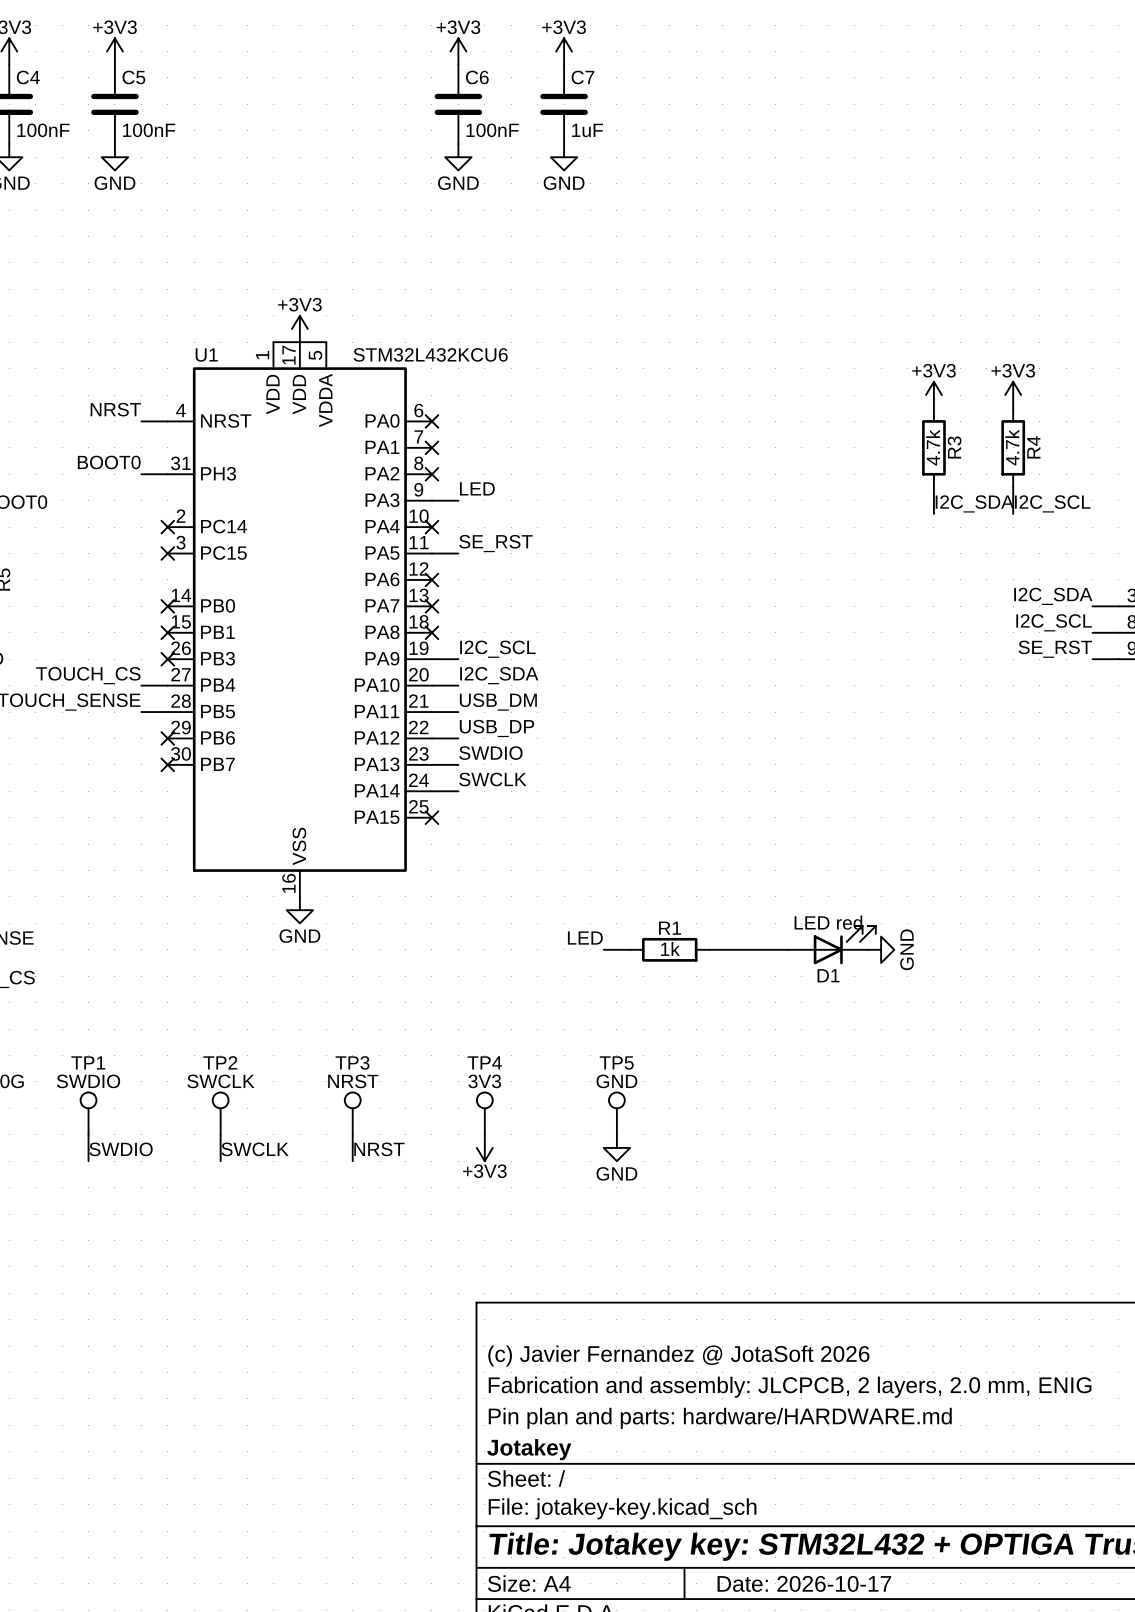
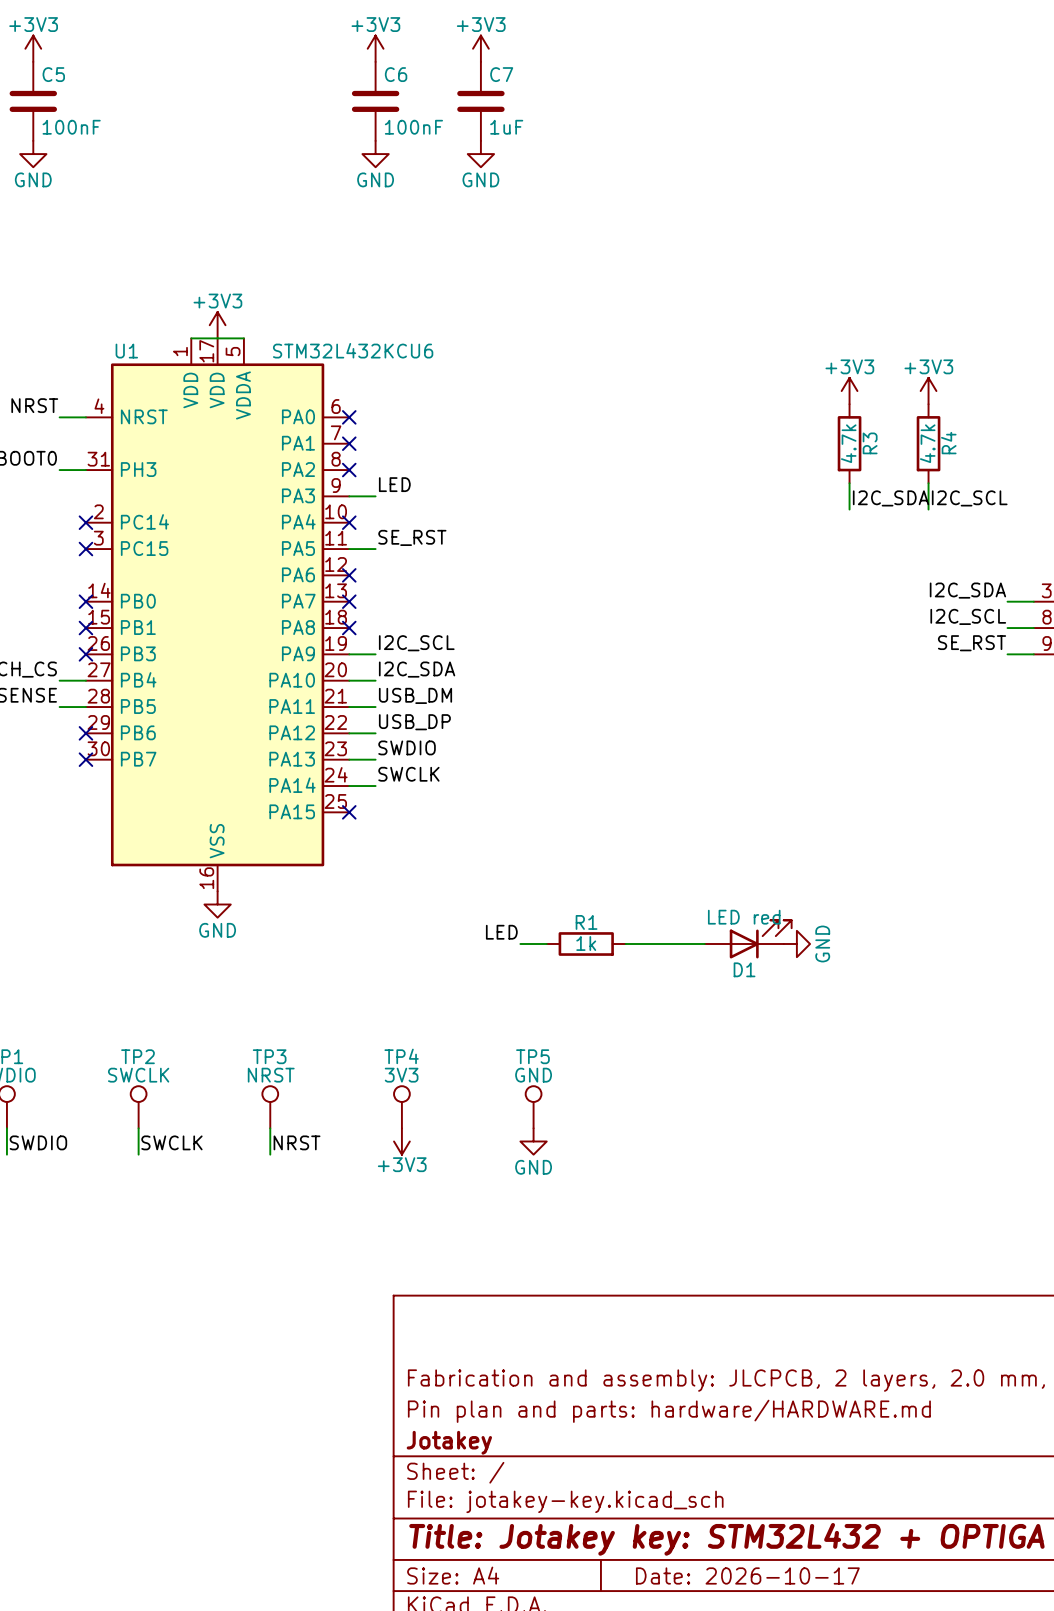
title block: (c) Javier Fernandez @ JotaSoft 2026 (678, 1355) -> none

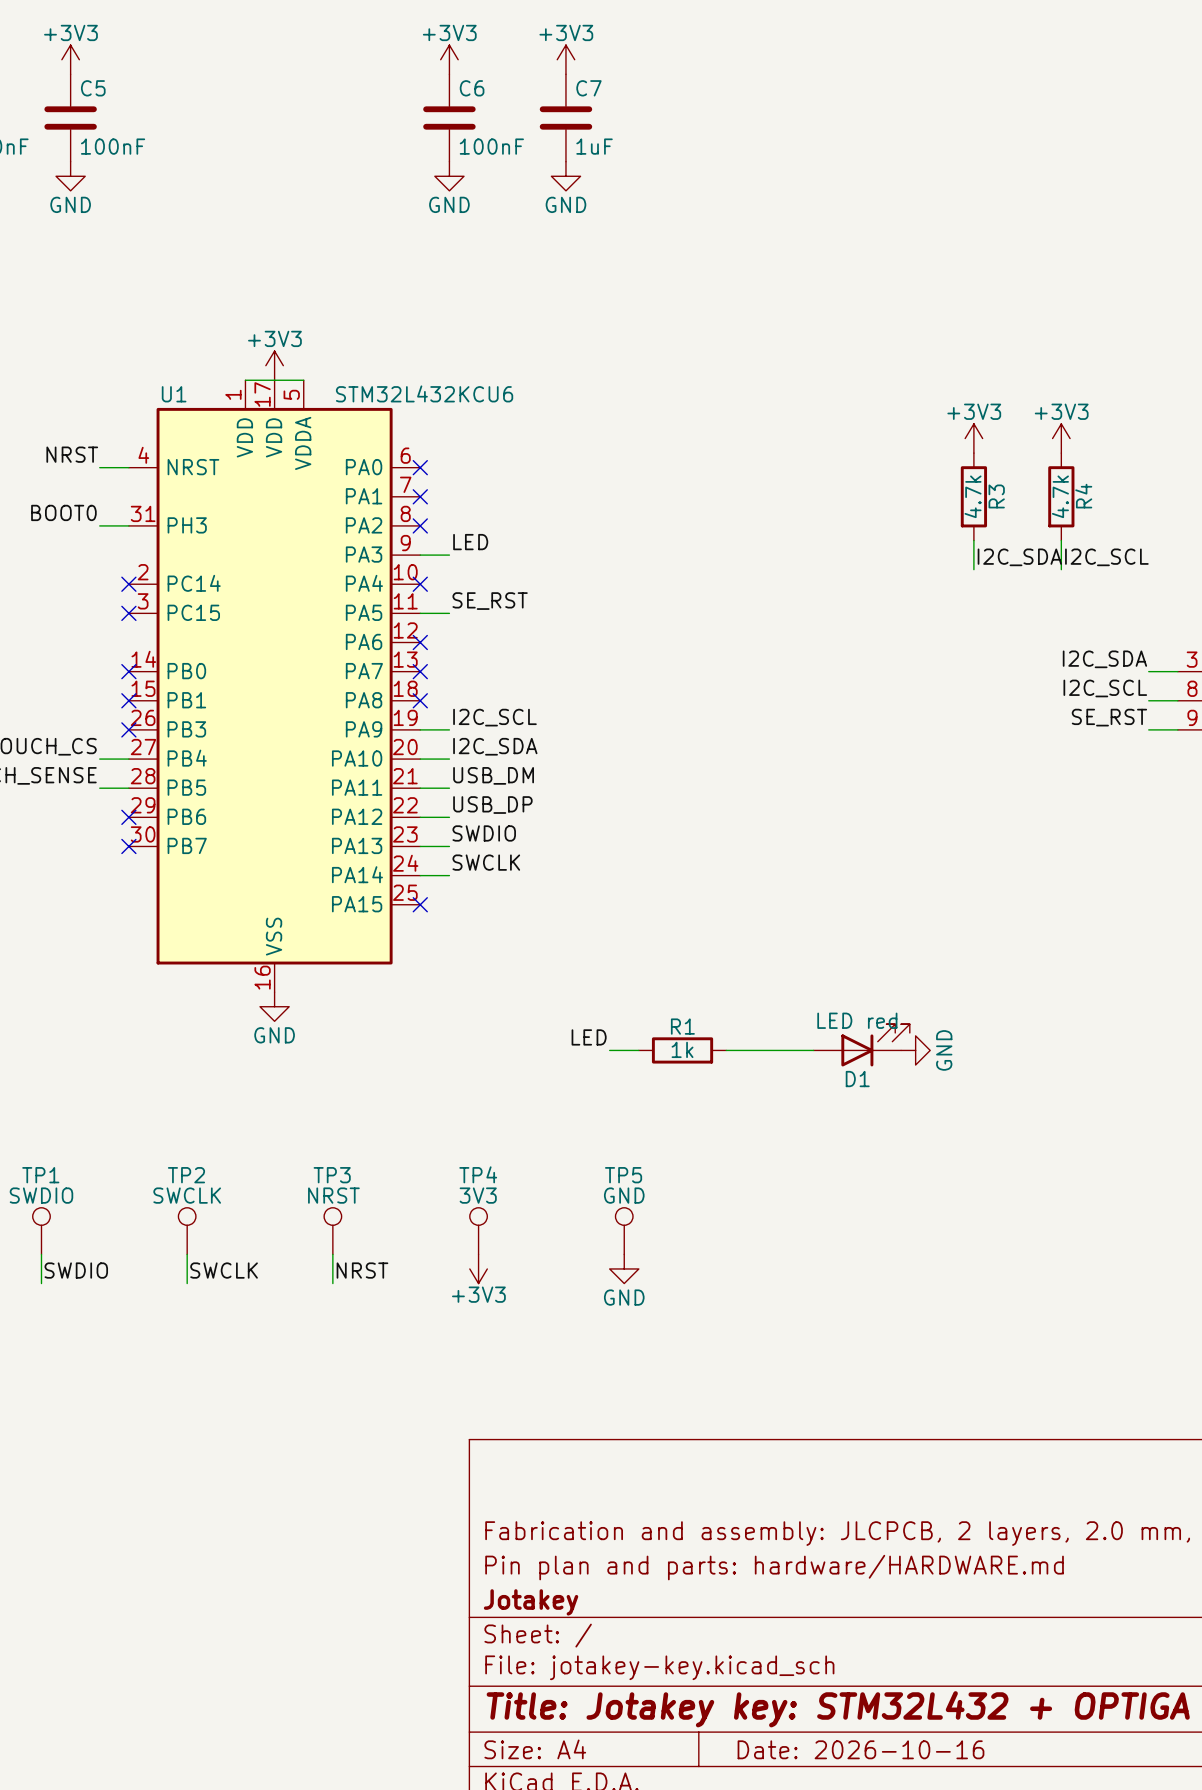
title block: Date: 2026-10-17 (747, 1575) -> Date: 2026-10-16 (860, 1749)

